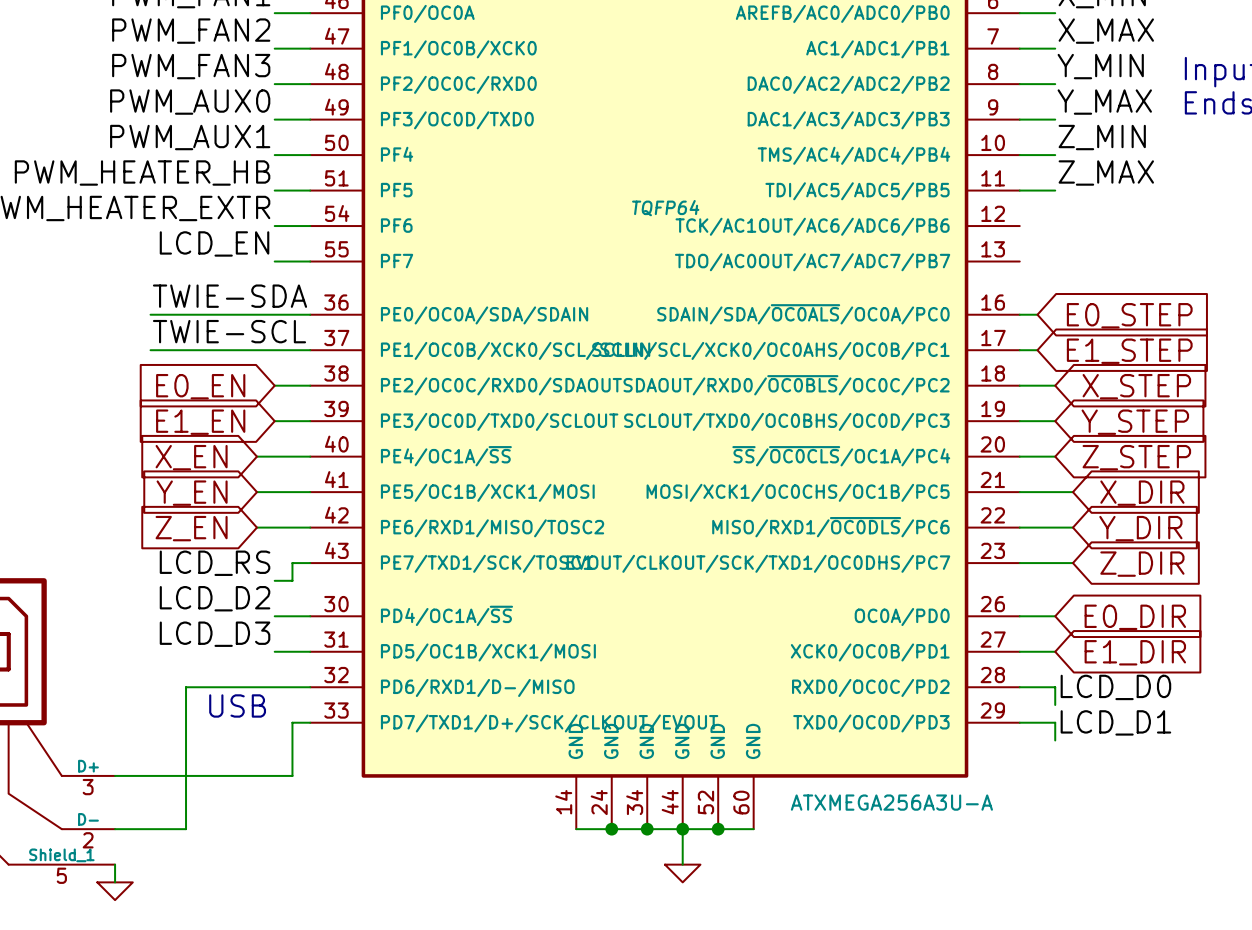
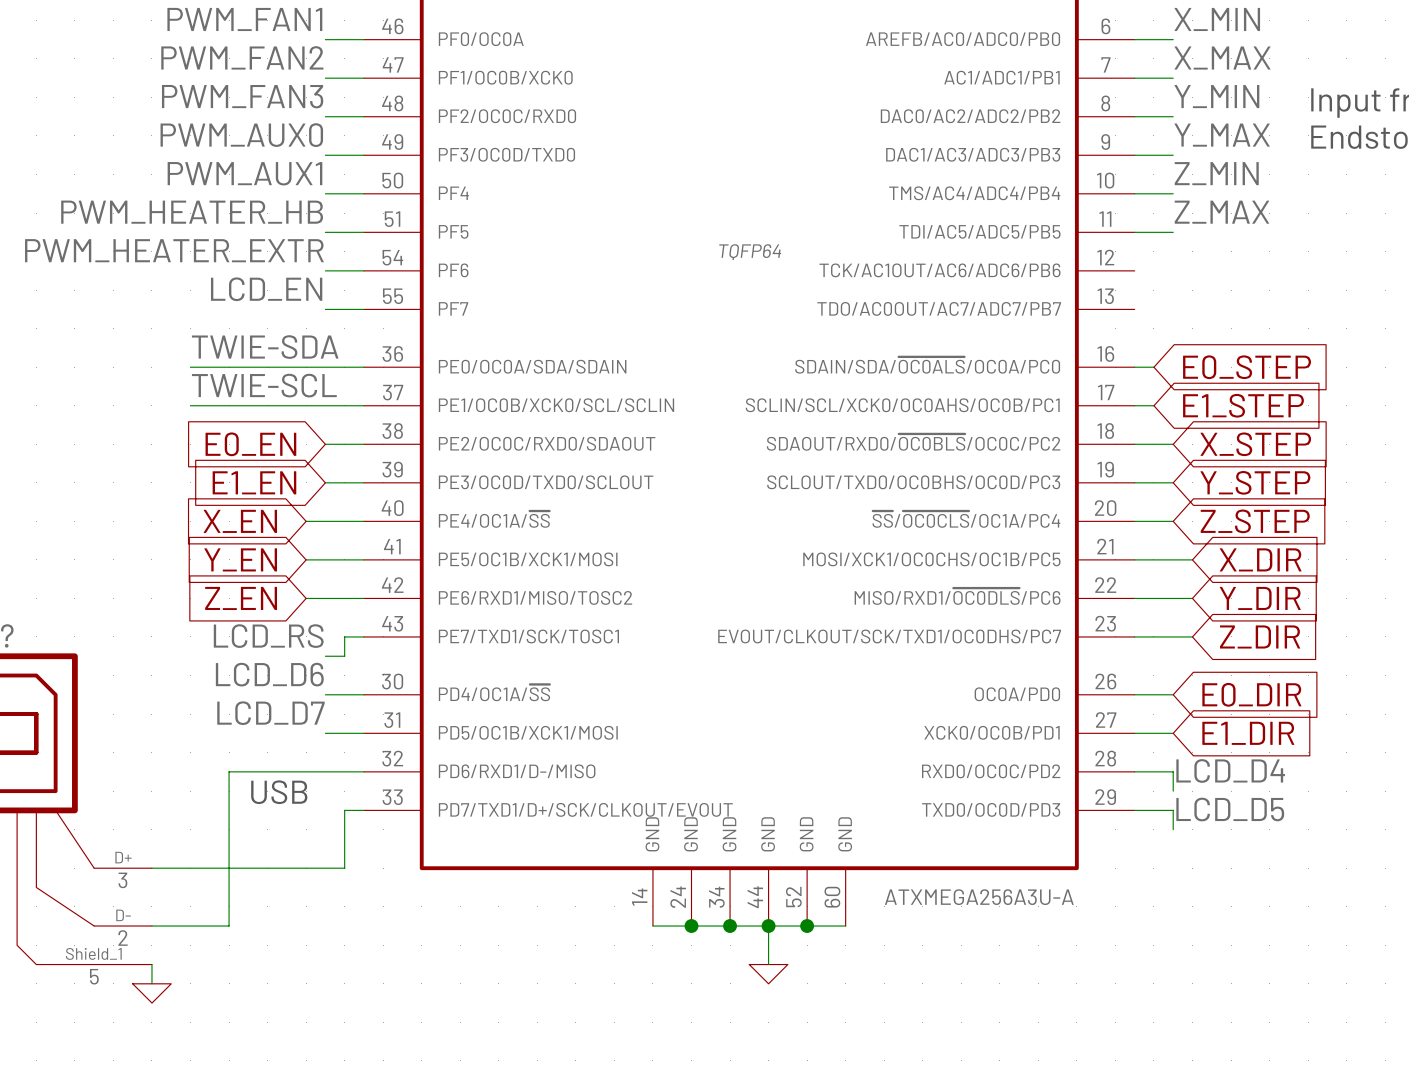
label: LCD_D2 (215, 598) -> LCD_D6 (269, 674)
label: LCD_D3 (215, 634) -> LCD_D7 (270, 713)
label: LCD_D0 (1115, 687) -> LCD_D4 (1230, 770)
label: LCD_D1 (1115, 722) -> LCD_D5 (1230, 809)

